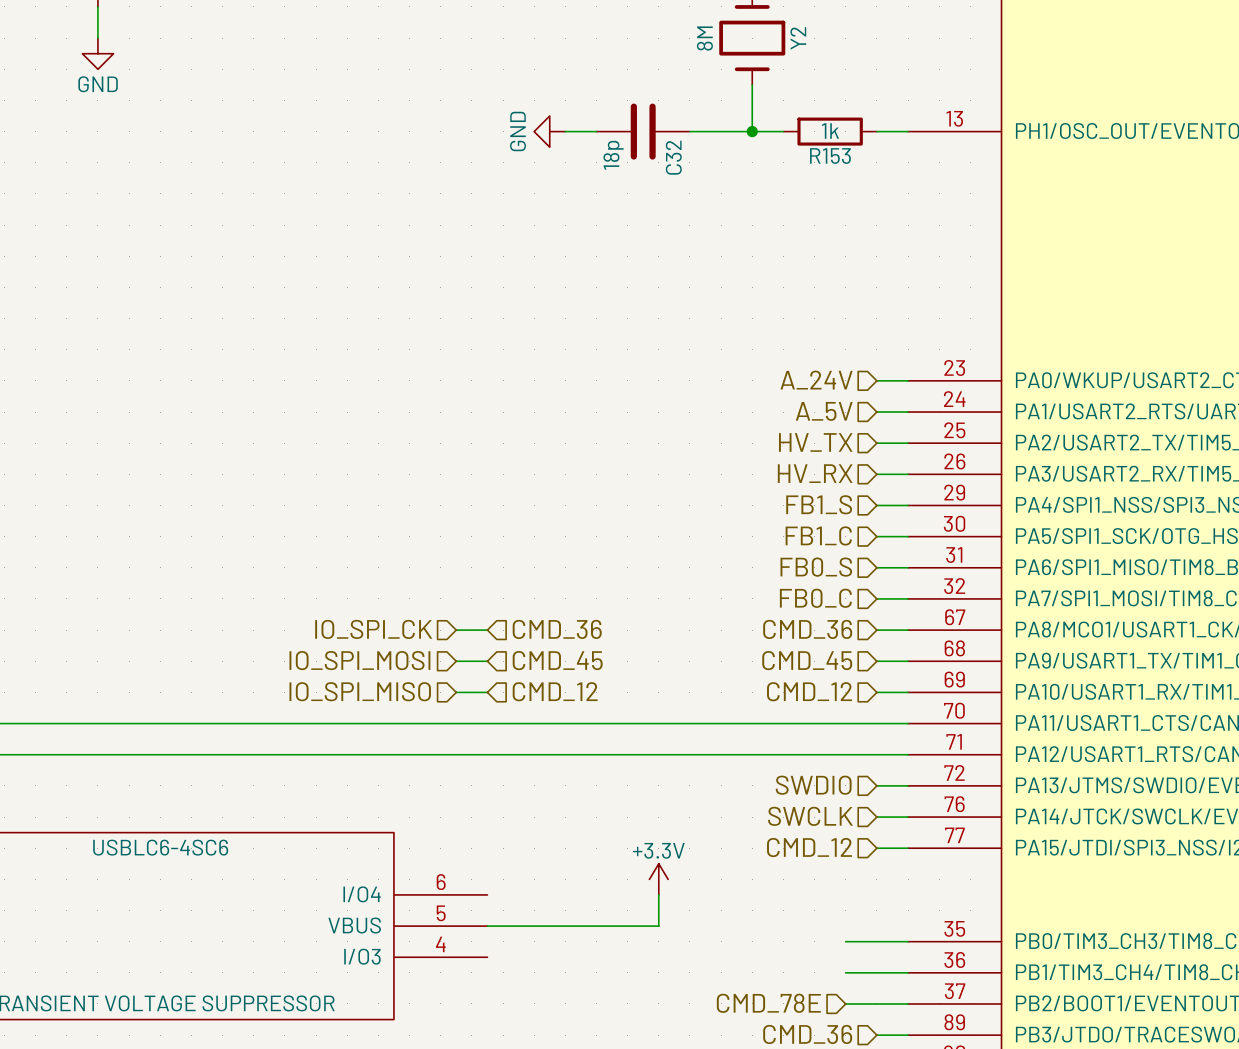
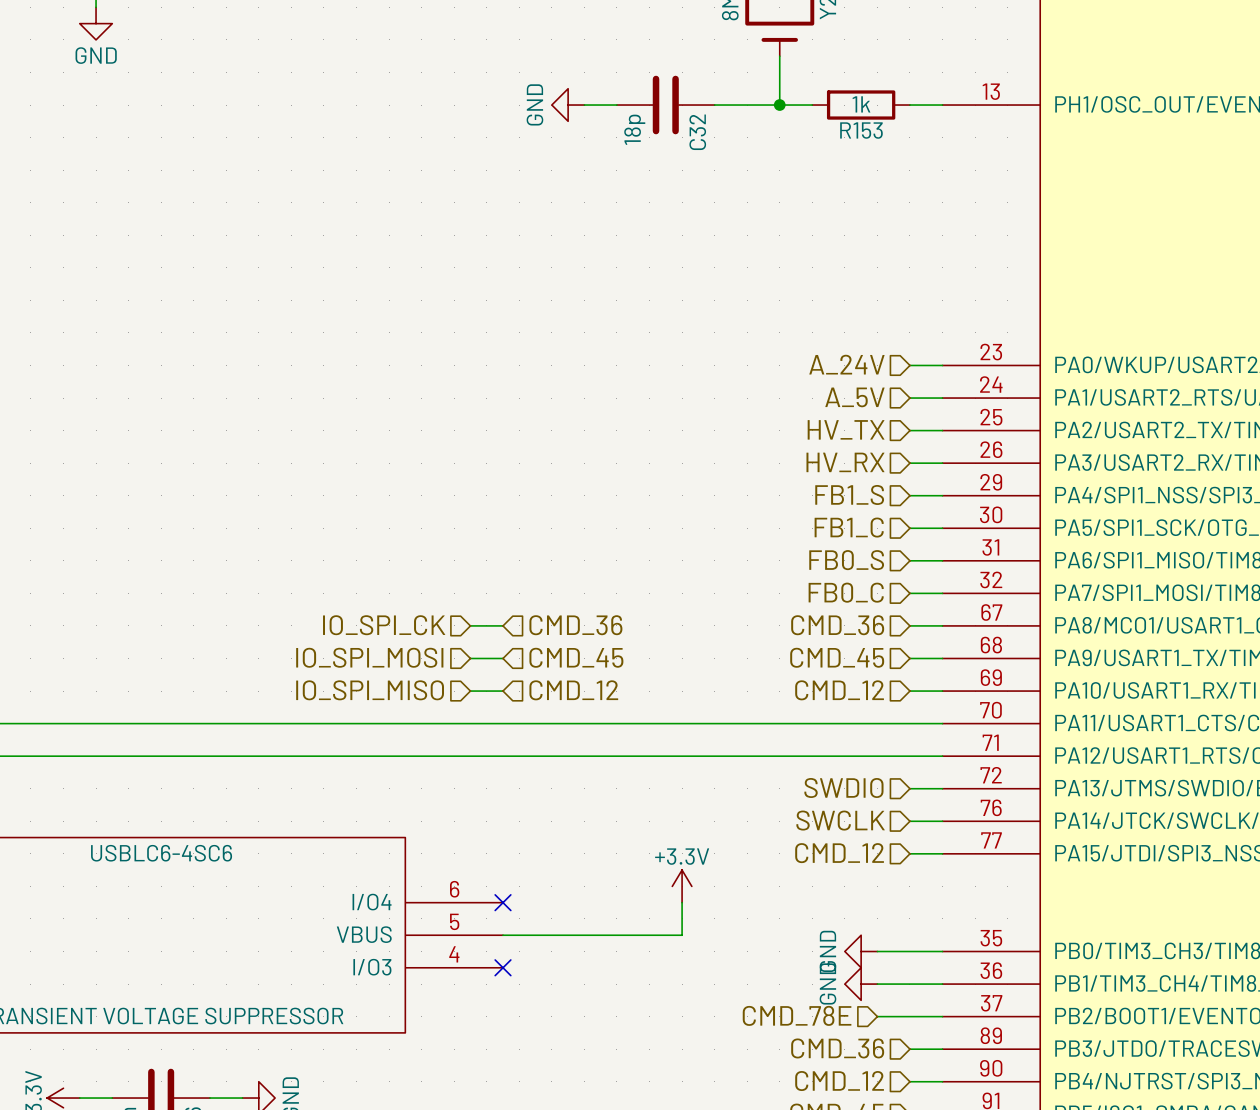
no-connect mark: none -> (503, 902)
power symbol: none -> GND (861, 951)
no-connect mark: none -> (503, 967)
power symbol: none -> GND (861, 984)

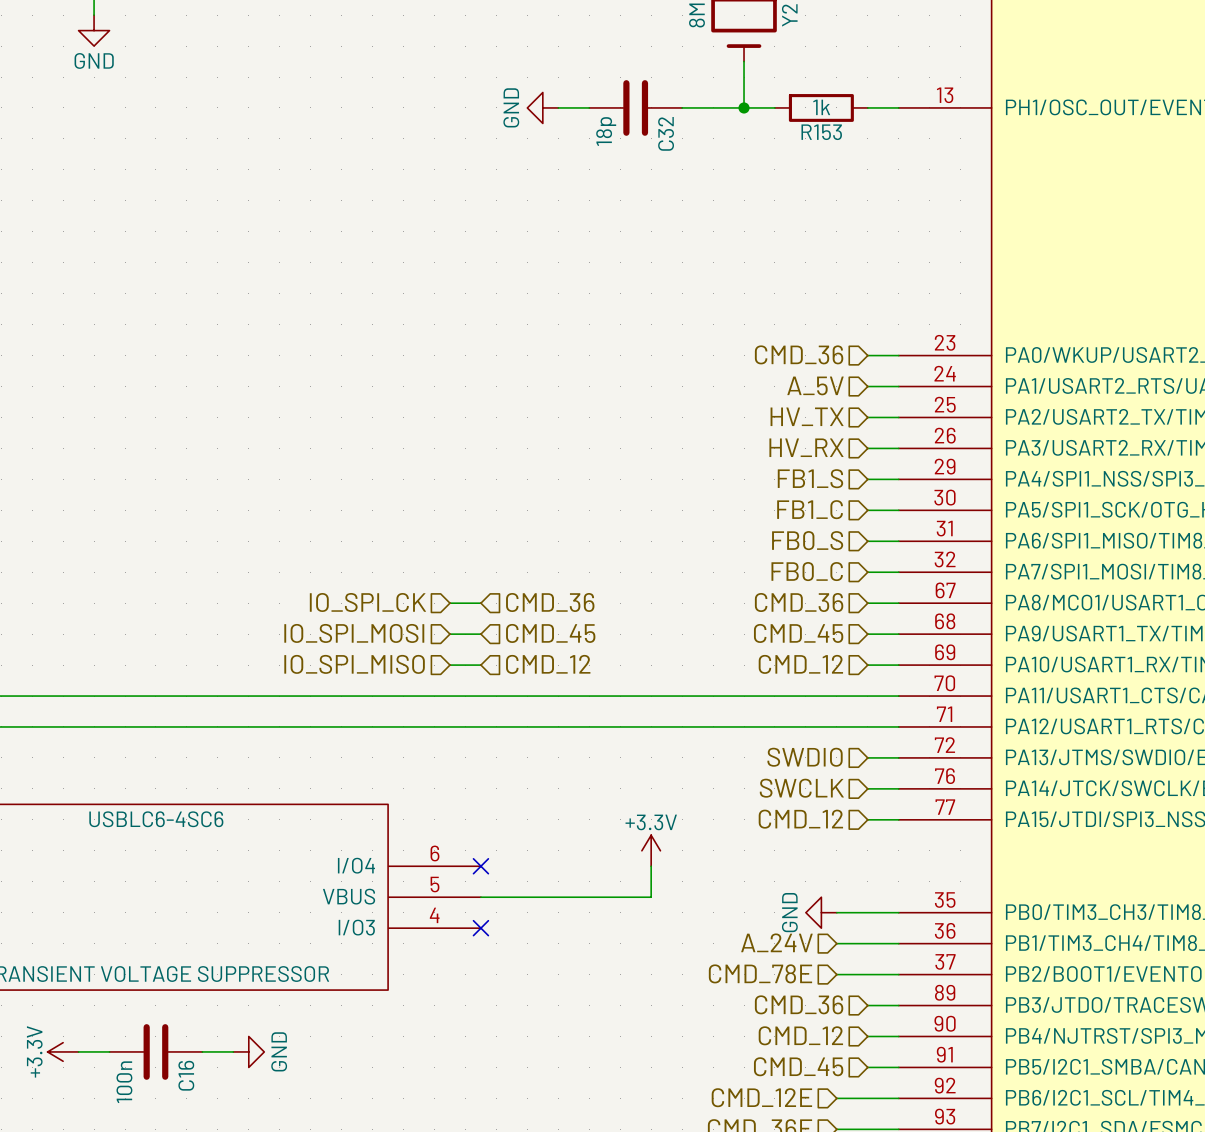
hierarchical label: A_24V (846, 364) -> CMD_36 (799, 354)
hierarchical label: none -> A_24V (776, 942)
power symbol: GND (861, 984) -> none

